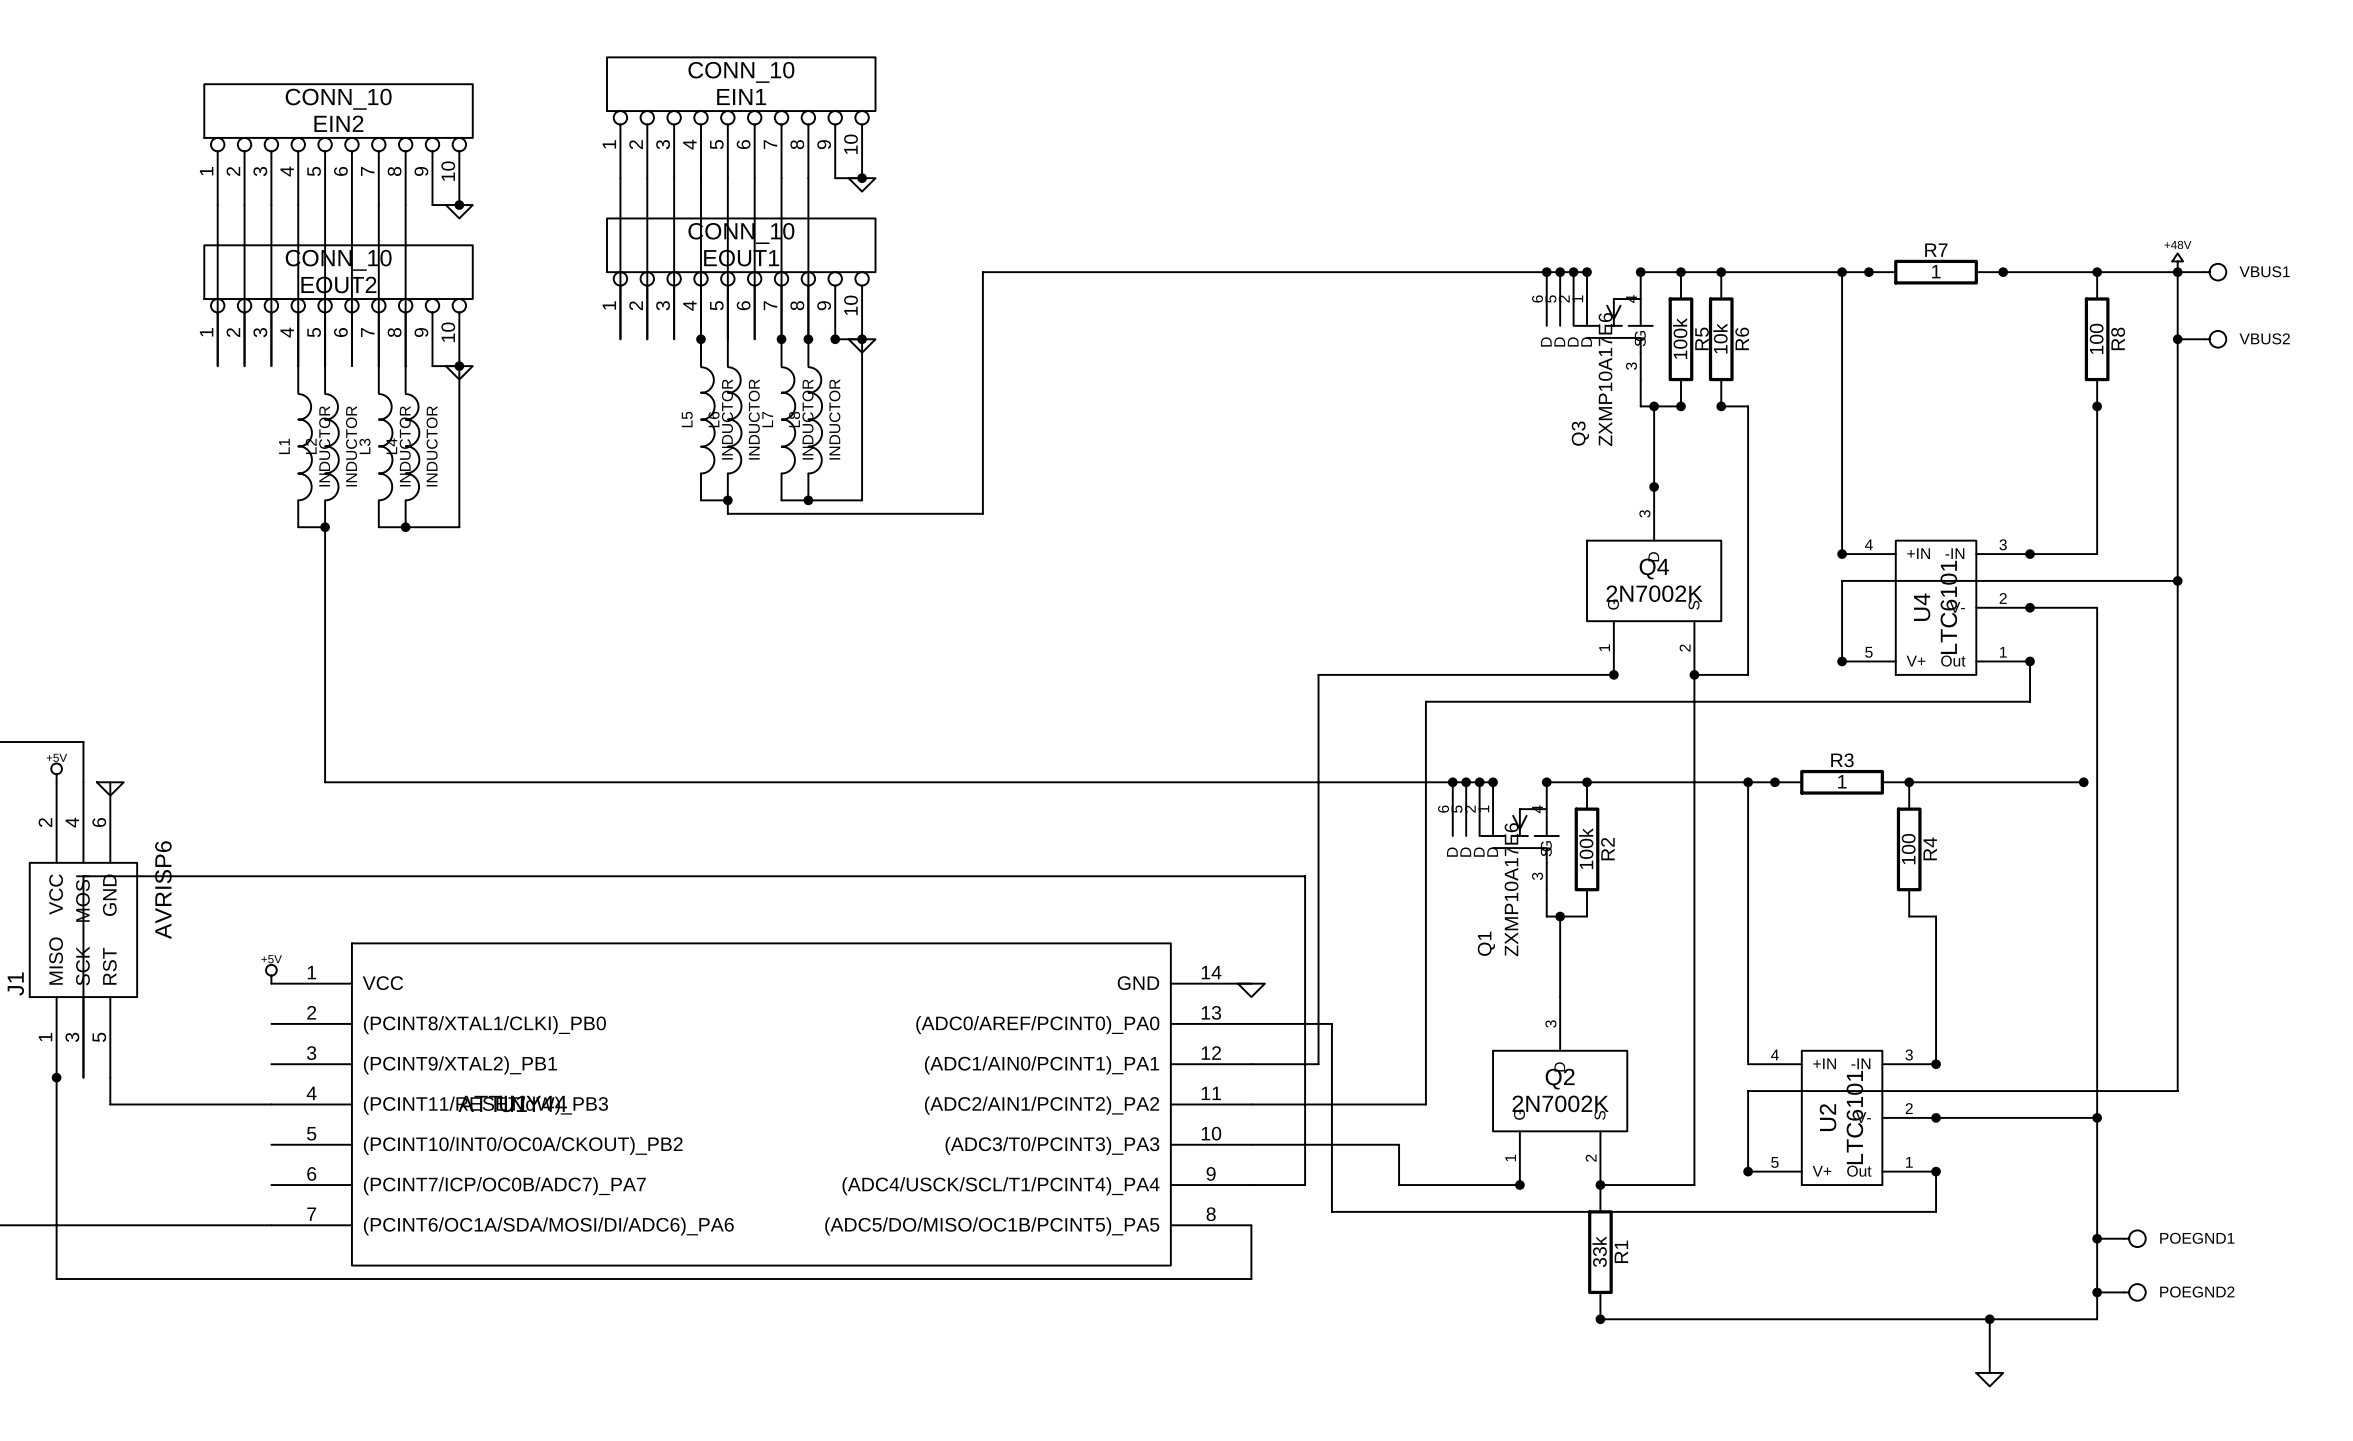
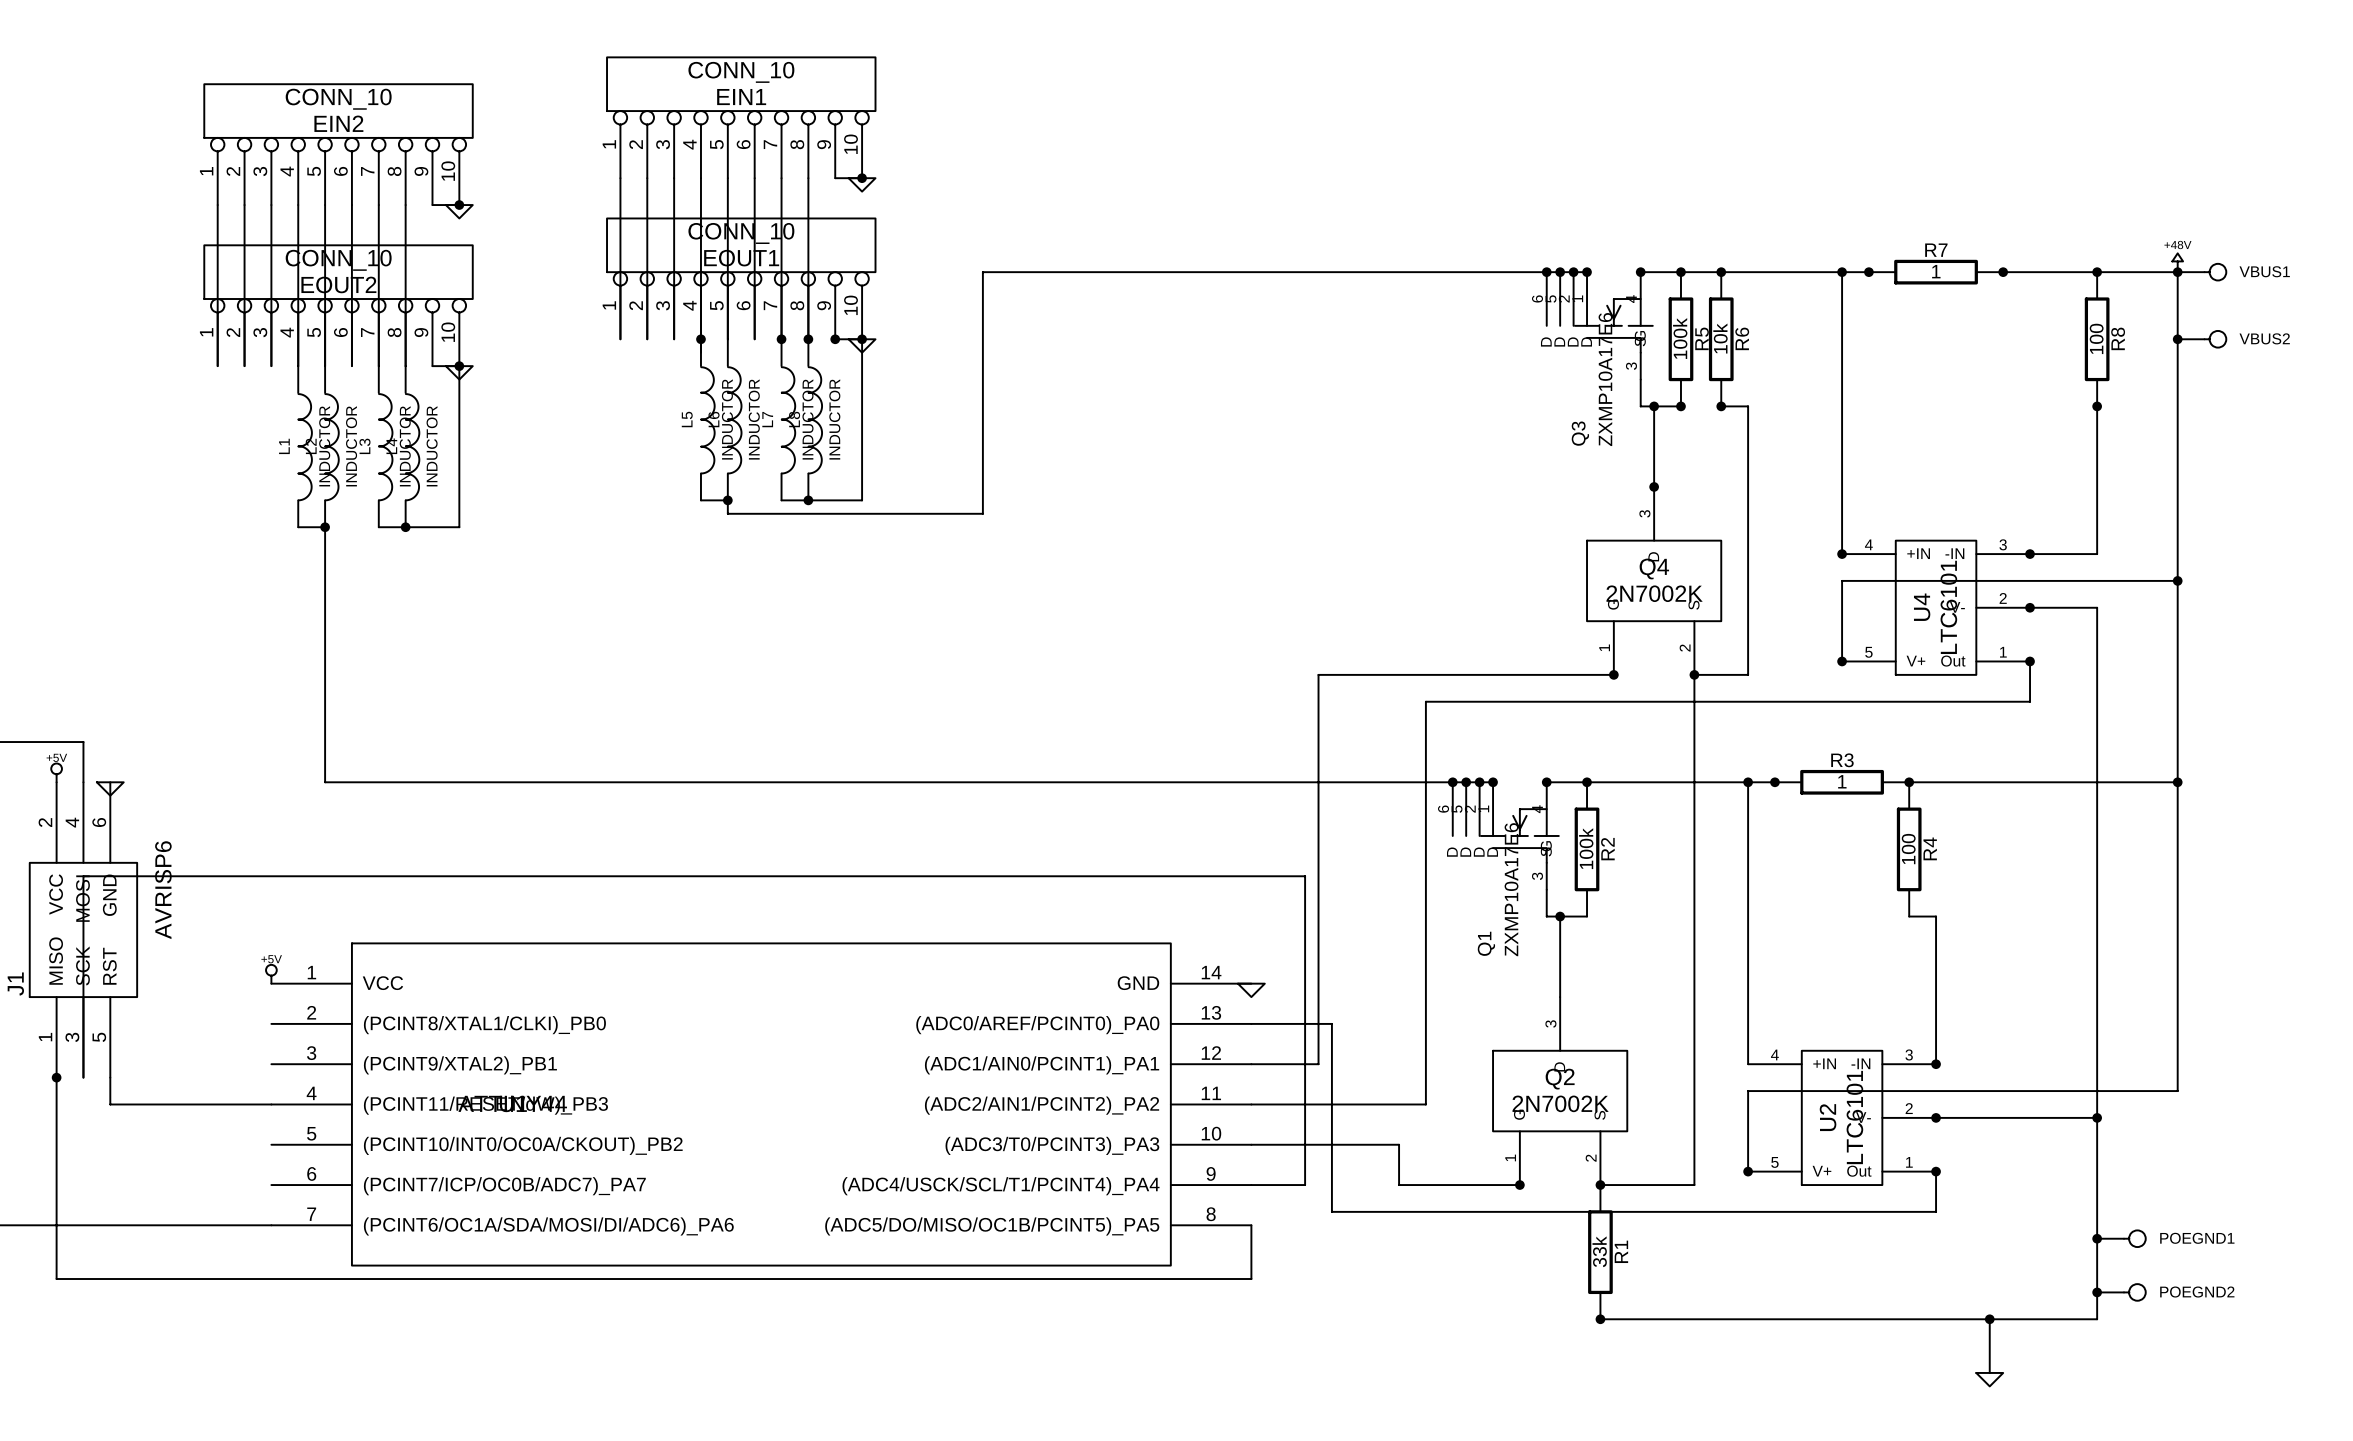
wire: none -> (2083, 782) (2177, 782)
junction: (2083, 782) -> none
junction: none -> (2177, 782)

